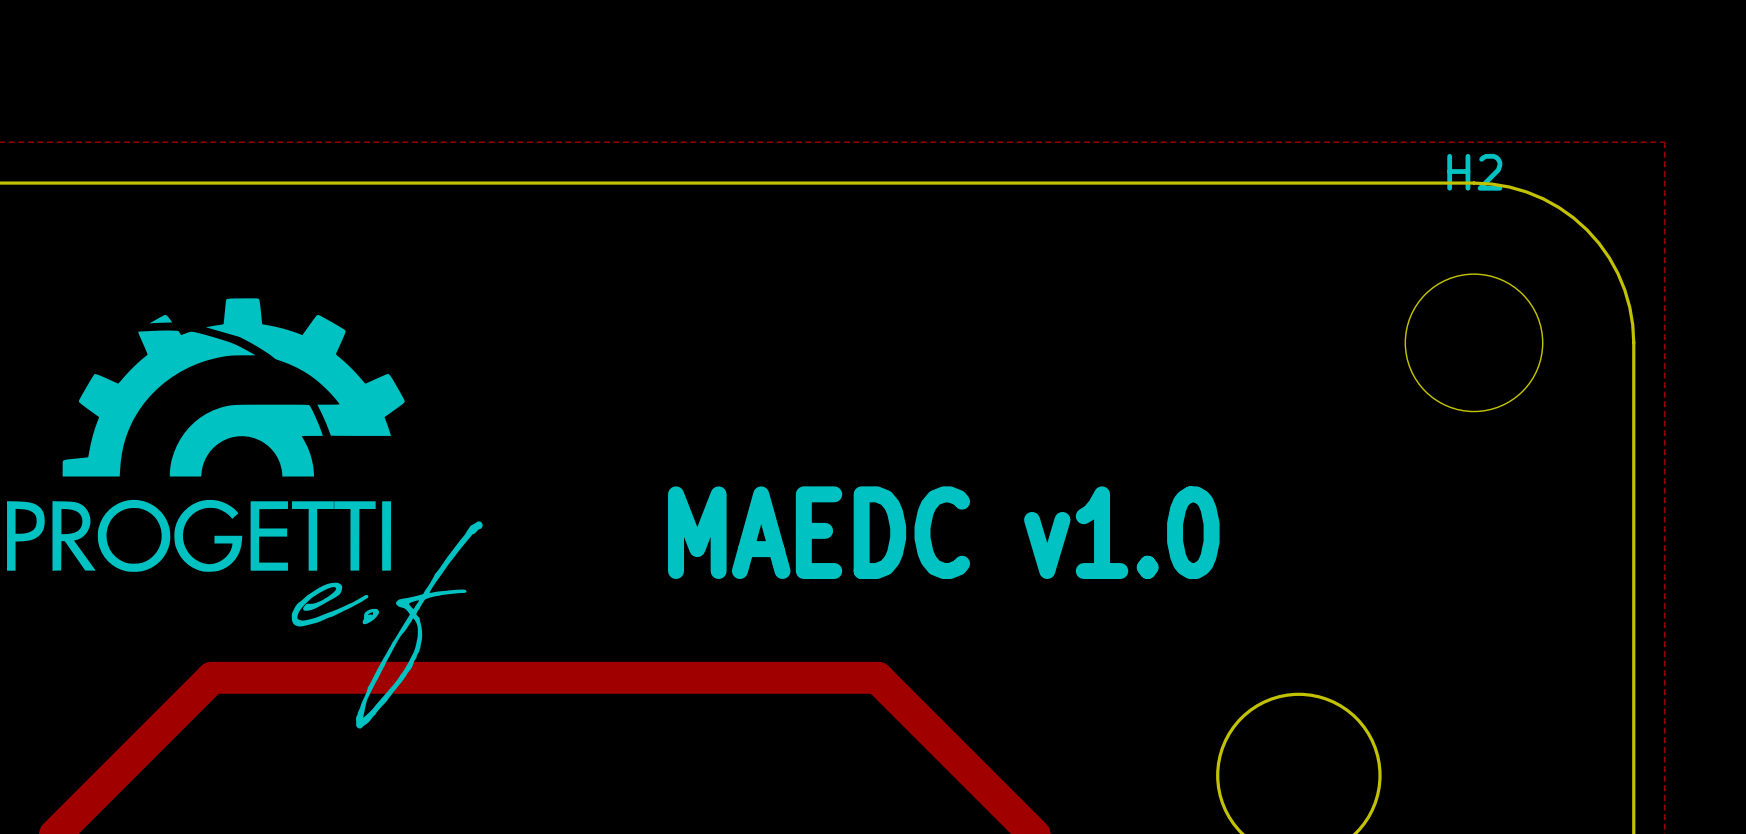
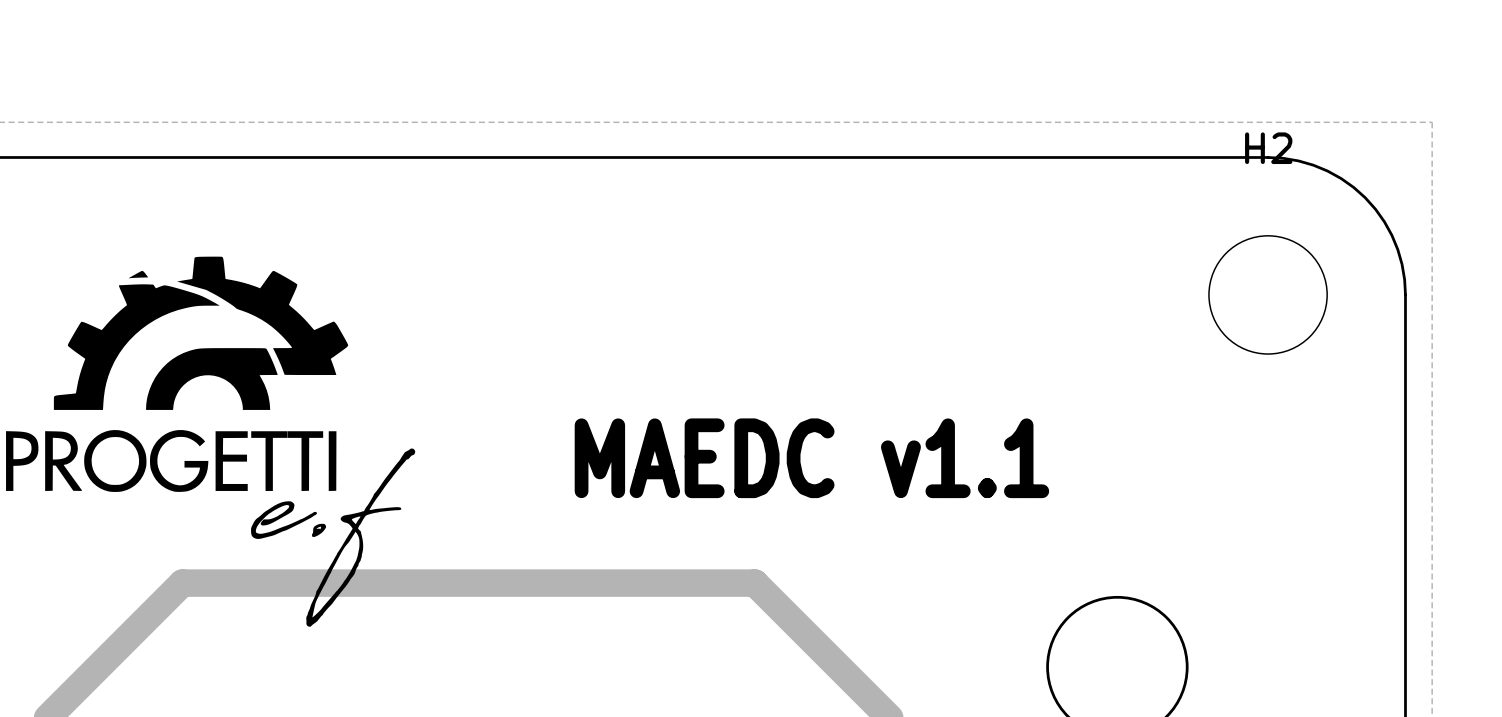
text: MAEDC v1.0 (943, 532) -> MAEDC v1.1 (811, 458)

